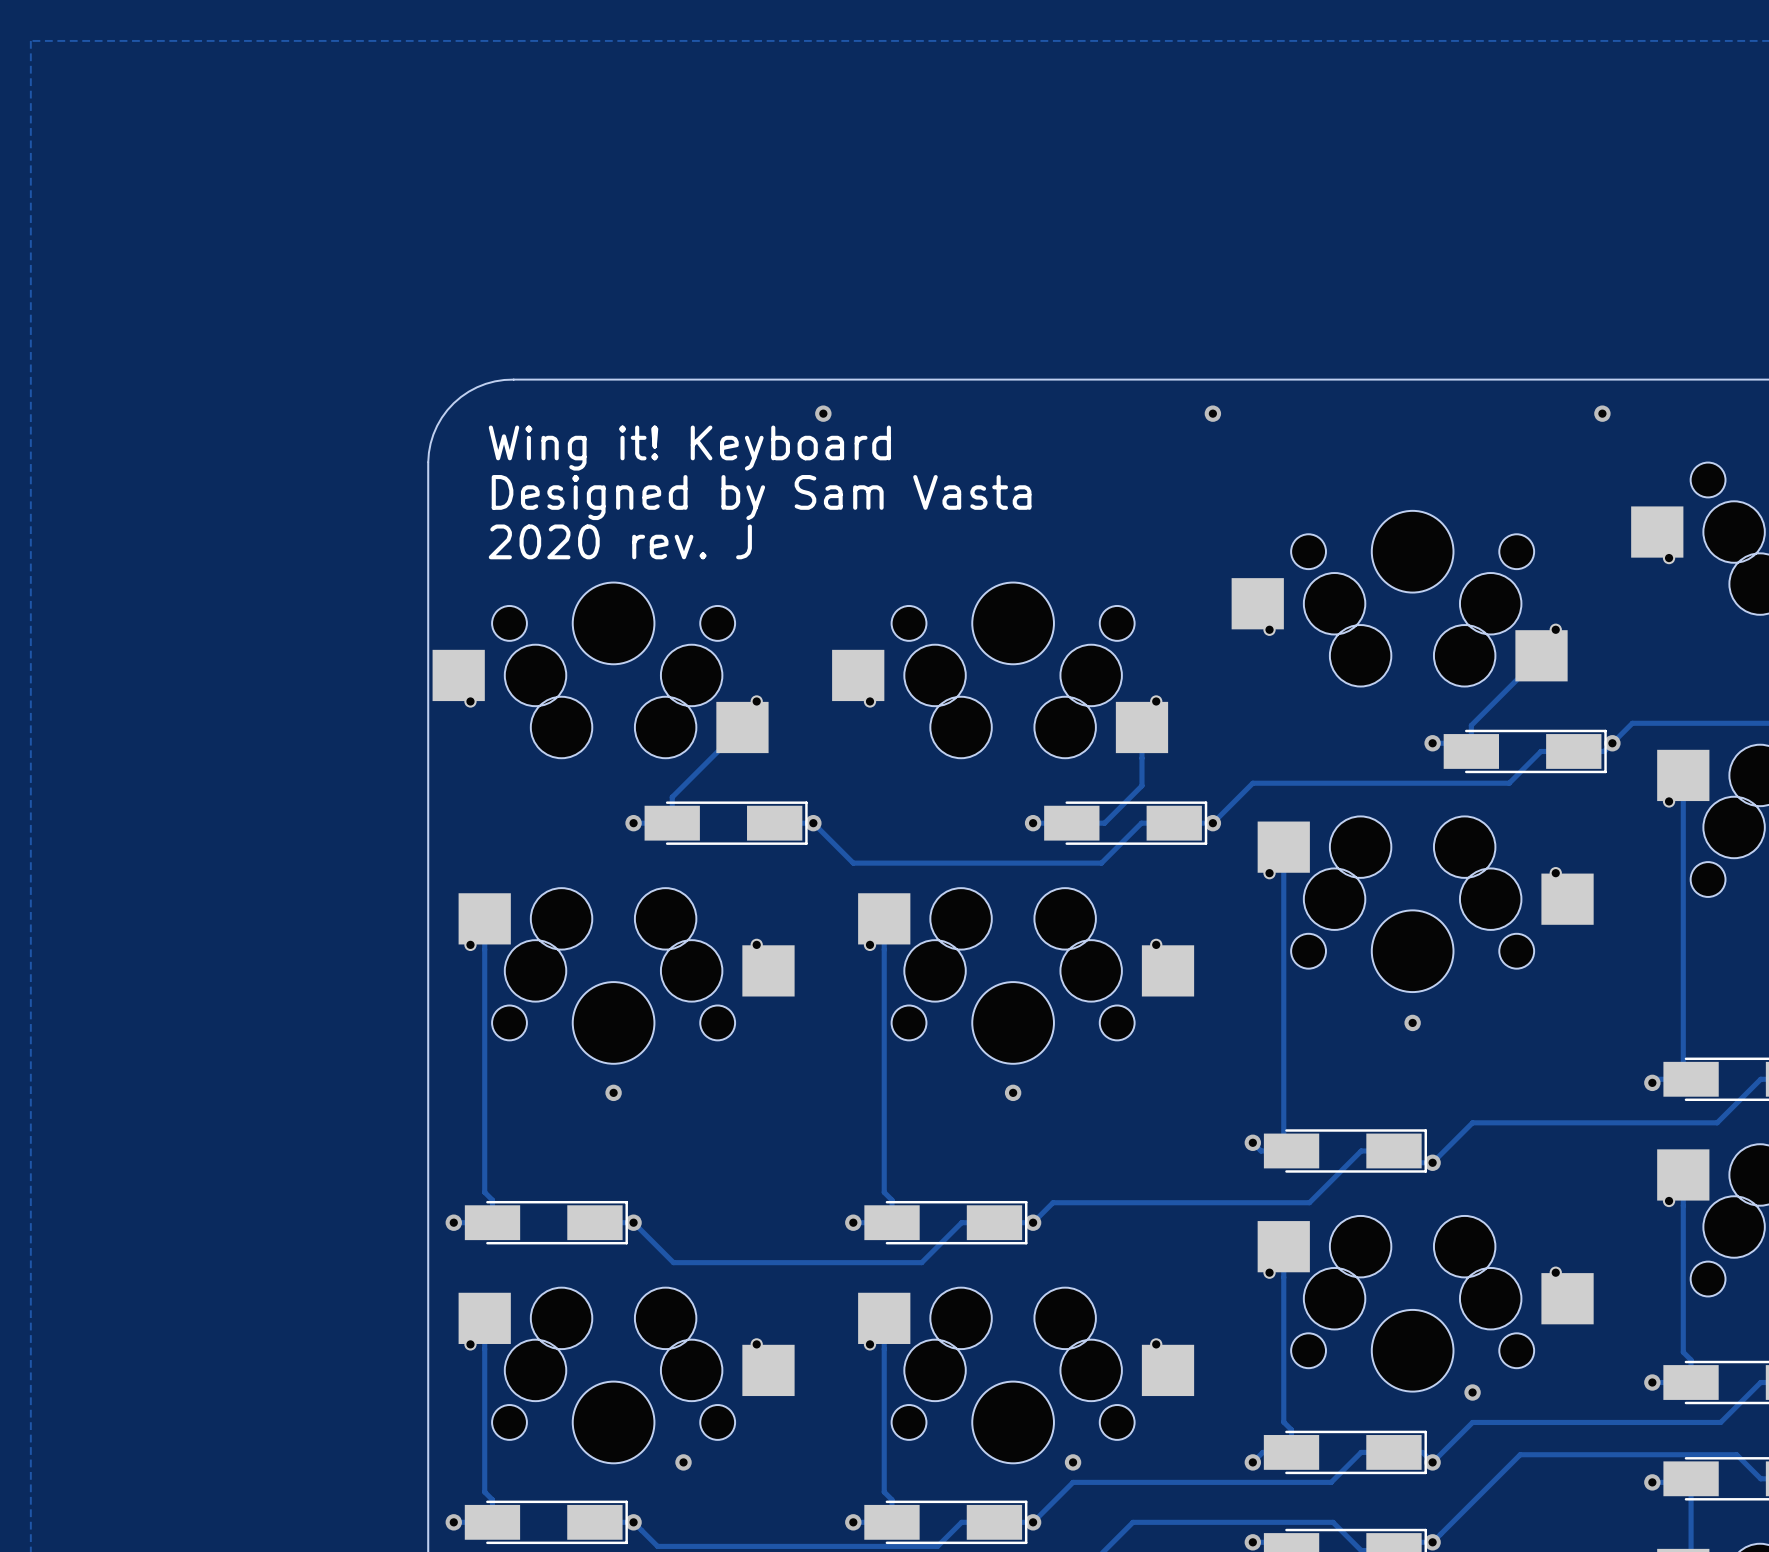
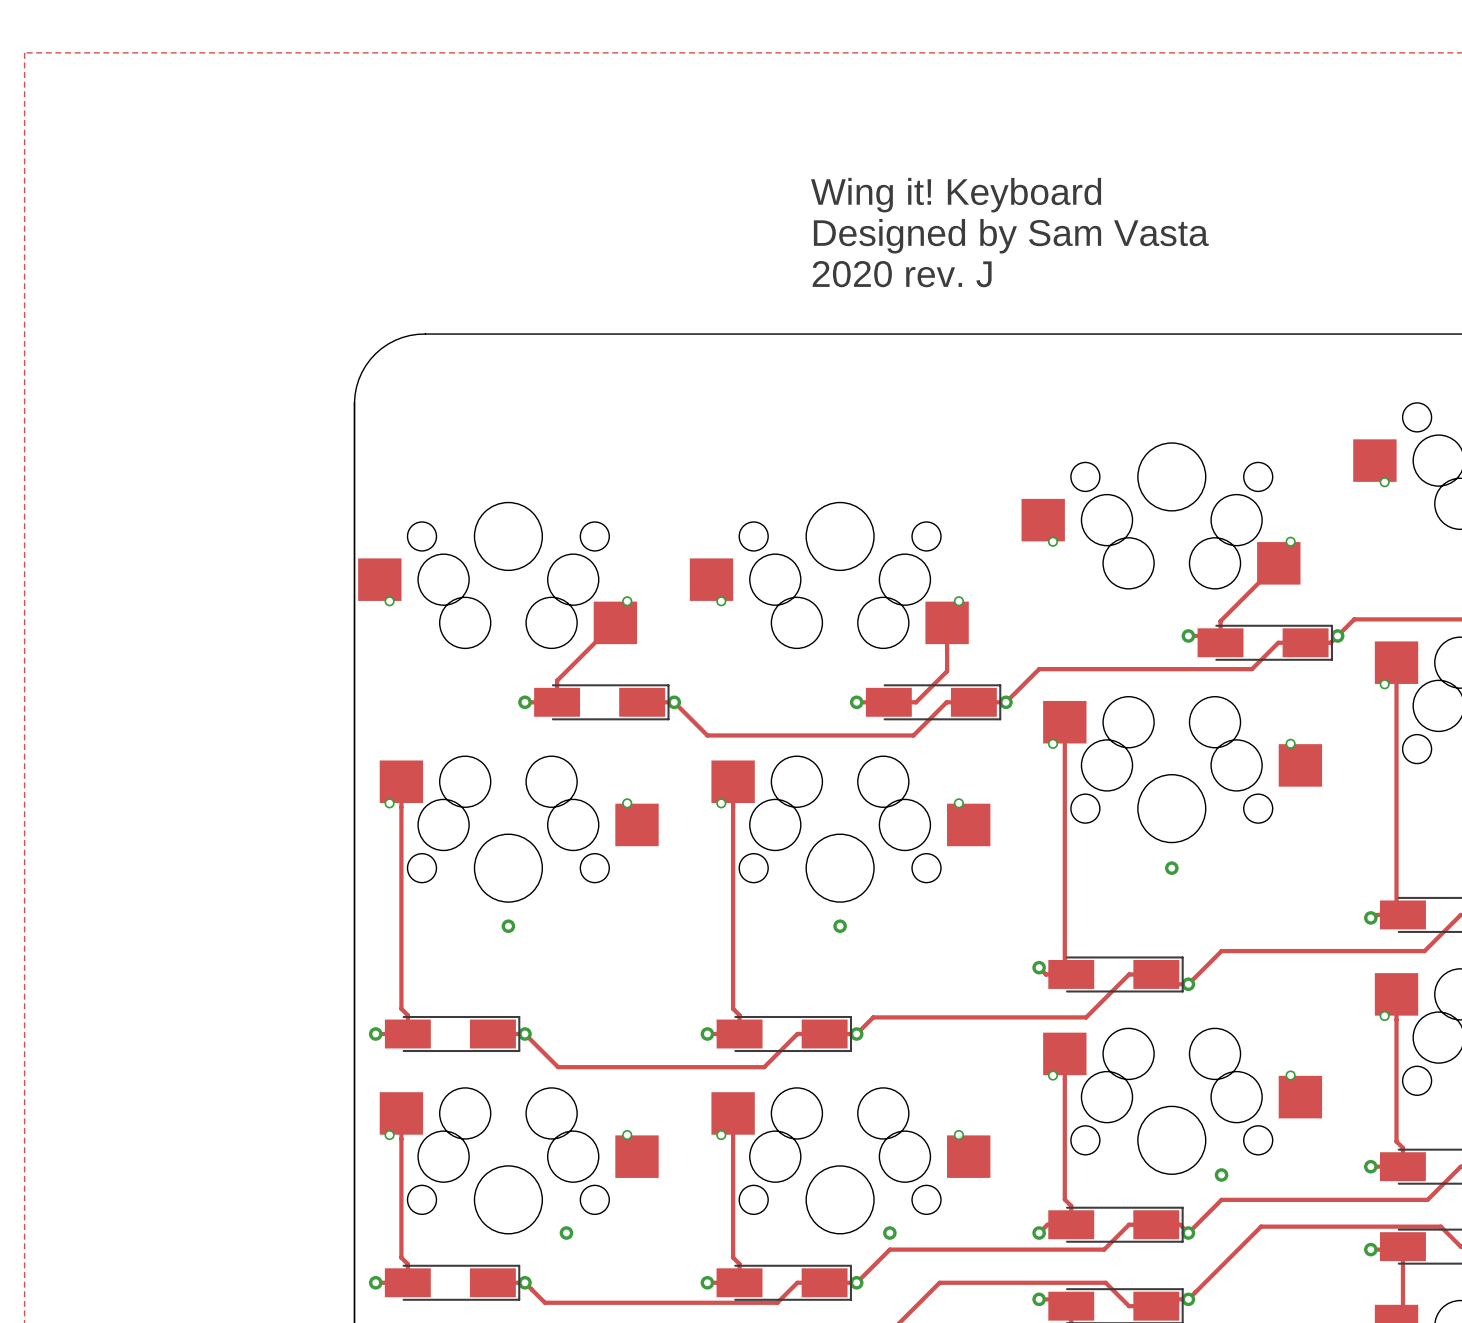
text: none -> Wing it! Keyboard (956, 195)
text: none -> Designed by Sam Vasta (1011, 236)
text: none -> 2020 rev. J (902, 274)
via: (823, 413) -> none
via: (1212, 413) -> none
via: (1602, 413) -> none
text: Wing it! Keyboard (689, 448) -> none
text: Designed by Sam Vasta (761, 497) -> none
text: 2020 rev. J (620, 541) -> none

